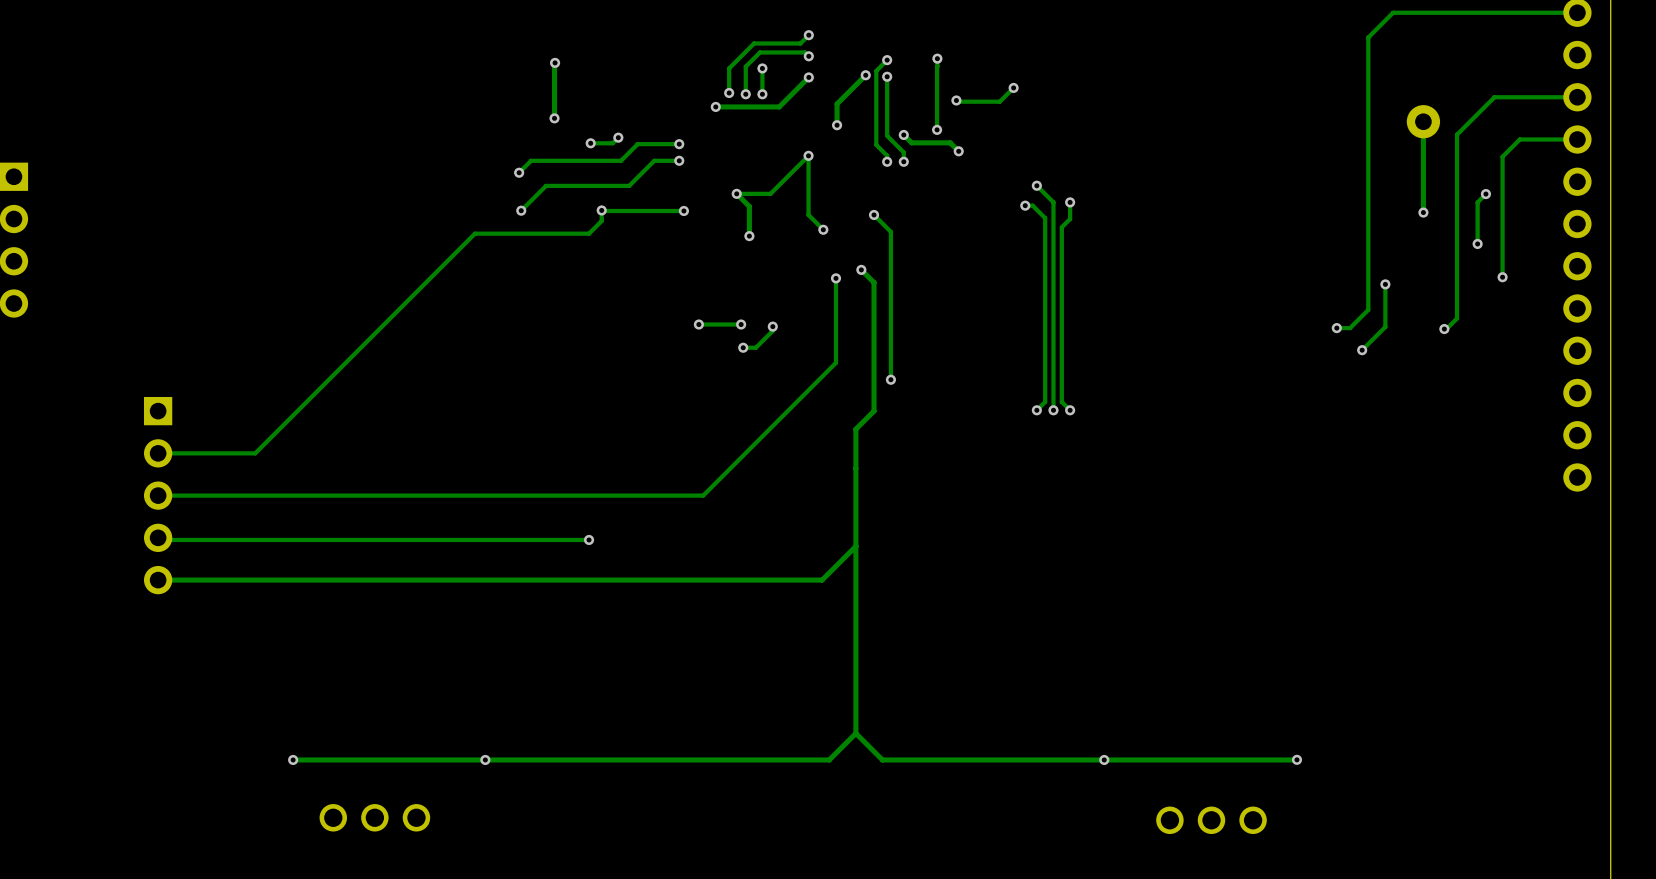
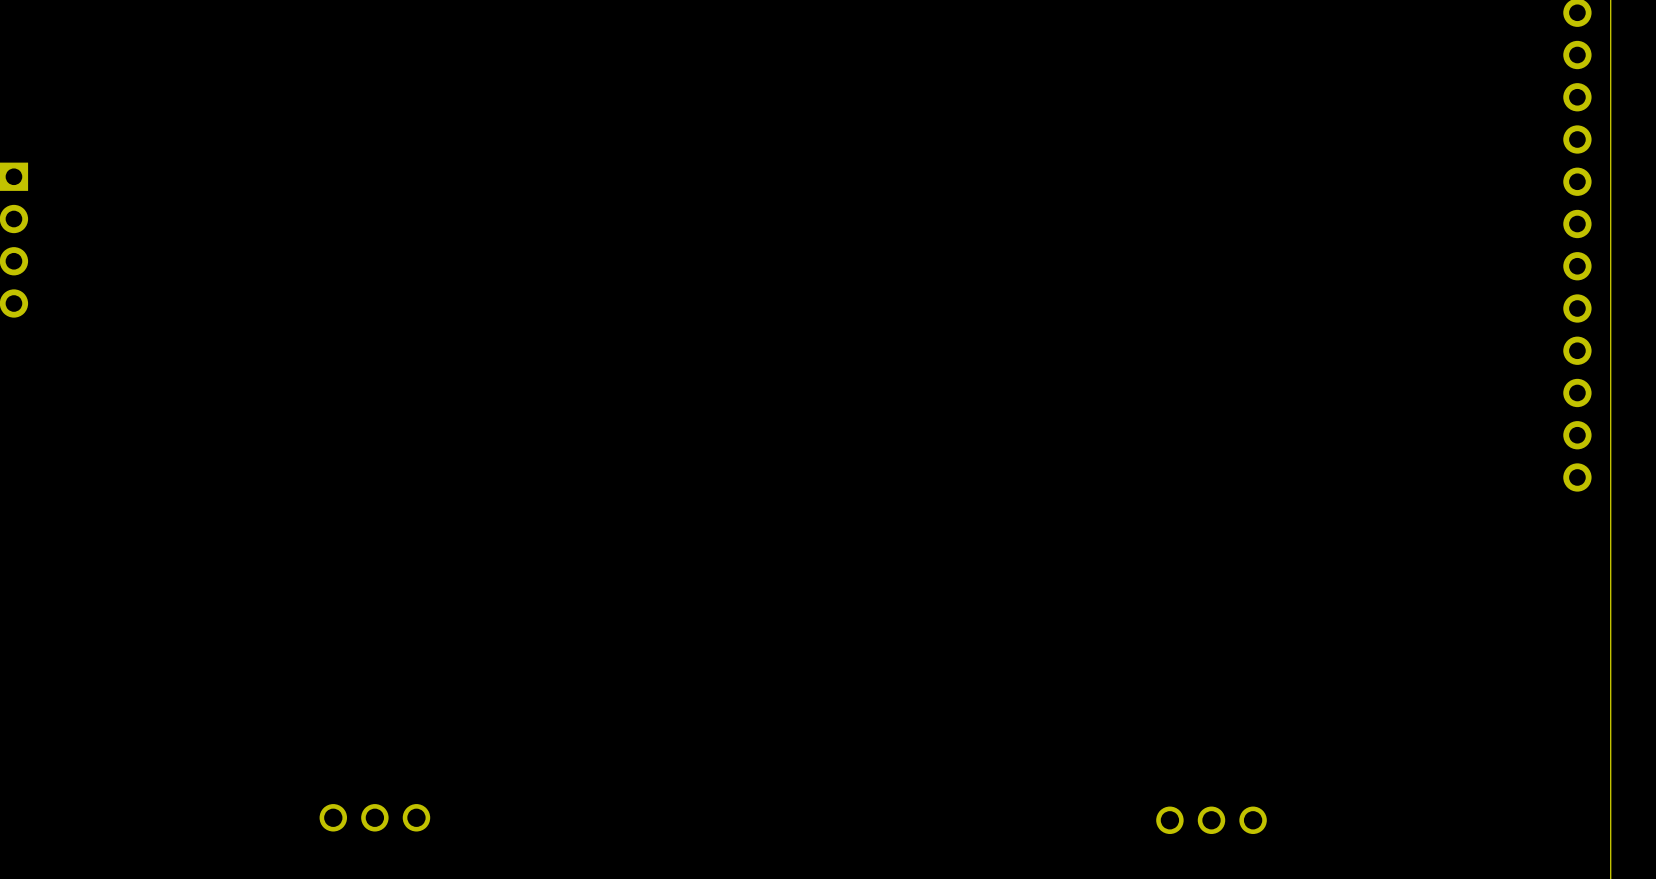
track: (1577, 12) (1393, 12) (1368, 37) (1368, 309) (1350, 328) (1336, 328) -> none
track: (808, 35) (800, 43) (754, 43) (729, 68) (729, 93) -> none
via: (808, 35) -> none
track: (808, 56) (804, 52) (759, 52) (745, 66) (745, 94) -> none
via: (808, 56) -> none
track: (937, 58) (937, 129) -> none
via: (937, 58) -> none
track: (887, 60) (876, 70) (876, 144) (887, 155) (887, 161) -> none
via: (887, 60) -> none
track: (555, 62) (554, 118) -> none
via: (555, 62) -> none
track: (762, 68) (762, 94) -> none
via: (762, 68) -> none
track: (865, 75) (837, 103) (837, 125) -> none
via: (865, 75) -> none
track: (887, 76) (887, 135) (903, 152) (903, 161) -> none
via: (887, 76) -> none
track: (808, 77) (779, 106) (715, 106) -> none
via: (808, 77) -> none
track: (1013, 87) (999, 101) (956, 100) -> none
via: (1013, 87) -> none
via: (729, 93) -> none
via: (745, 94) -> none
via: (762, 94) -> none
track: (1577, 97) (1494, 97) (1457, 134) (1457, 318) (1444, 329) -> none
via: (956, 100) -> none
via: (715, 106) -> none
via: (554, 118) -> none
track: (1423, 121) (1423, 212) -> none
part: (1423, 121) -> none
via: (837, 125) -> none
via: (937, 129) -> none
track: (903, 134) (911, 142) (950, 142) (958, 151) -> none
via: (903, 134) -> none
track: (618, 137) (612, 143) (590, 143) -> none
via: (618, 137) -> none
track: (1577, 139) (1519, 139) (1502, 156) (1502, 277) -> none
via: (590, 143) -> none
track: (679, 144) (637, 144) (621, 160) (531, 160) (519, 172) -> none
via: (679, 144) -> none
via: (958, 151) -> none
via: (808, 155) -> none
track: (679, 160) (654, 160) (629, 185) (546, 185) (521, 210) -> none
via: (679, 160) -> none
via: (887, 161) -> none
via: (903, 161) -> none
via: (519, 172) -> none
track: (1036, 185) (1053, 202) (1053, 410) -> none
via: (1036, 185) -> none
via: (736, 193) -> none
track: (1485, 194) (1477, 202) (1477, 243) -> none
via: (1485, 194) -> none
track: (1070, 202) (1070, 219) (1061, 227) (1061, 401) (1070, 410) -> none
via: (1070, 202) -> none
track: (1025, 205) (1032, 205) (1045, 218) (1045, 401) (1036, 410) -> none
via: (1025, 205) -> none
via: (521, 210) -> none
via: (601, 210) -> none
track: (683, 210) (601, 210) (601, 221) (589, 233) (474, 233) (255, 453) (158, 453) -> none
via: (683, 210) -> none
via: (1423, 212) -> none
track: (874, 214) (890, 231) (890, 379) -> none
via: (874, 214) -> none
track: (823, 229) (808, 214) (808, 155) (770, 193) (736, 193) (749, 206) (749, 236) -> none
via: (823, 229) -> none
via: (749, 236) -> none
via: (1477, 243) -> none
track: (861, 269) (874, 282) (874, 411) (855, 429) (855, 733) -> none
via: (861, 269) -> none
via: (1502, 277) -> none
track: (836, 278) (836, 362) (703, 495) (158, 495) -> none
via: (836, 278) -> none
track: (1385, 284) (1385, 326) (1362, 350) -> none
via: (1385, 284) -> none
via: (698, 324) -> none
track: (741, 324) (698, 324) -> none
via: (741, 324) -> none
track: (772, 326) (772, 330) (755, 347) (743, 347) -> none
via: (772, 326) -> none
via: (1336, 328) -> none
via: (1444, 329) -> none
via: (743, 347) -> none
via: (1362, 350) -> none
via: (890, 379) -> none
via: (1036, 410) -> none
via: (1053, 410) -> none
via: (1070, 410) -> none
part: (158, 495) -> none
track: (158, 537) (160, 539) (589, 539) -> none
via: (589, 539) -> none
track: (855, 546) (822, 580) (158, 580) -> none
track: (855, 733) (829, 759) (293, 759) -> none
track: (855, 733) (882, 759) (1296, 759) -> none
via: (293, 759) -> none
via: (485, 759) -> none
via: (1104, 759) -> none
via: (1296, 759) -> none

